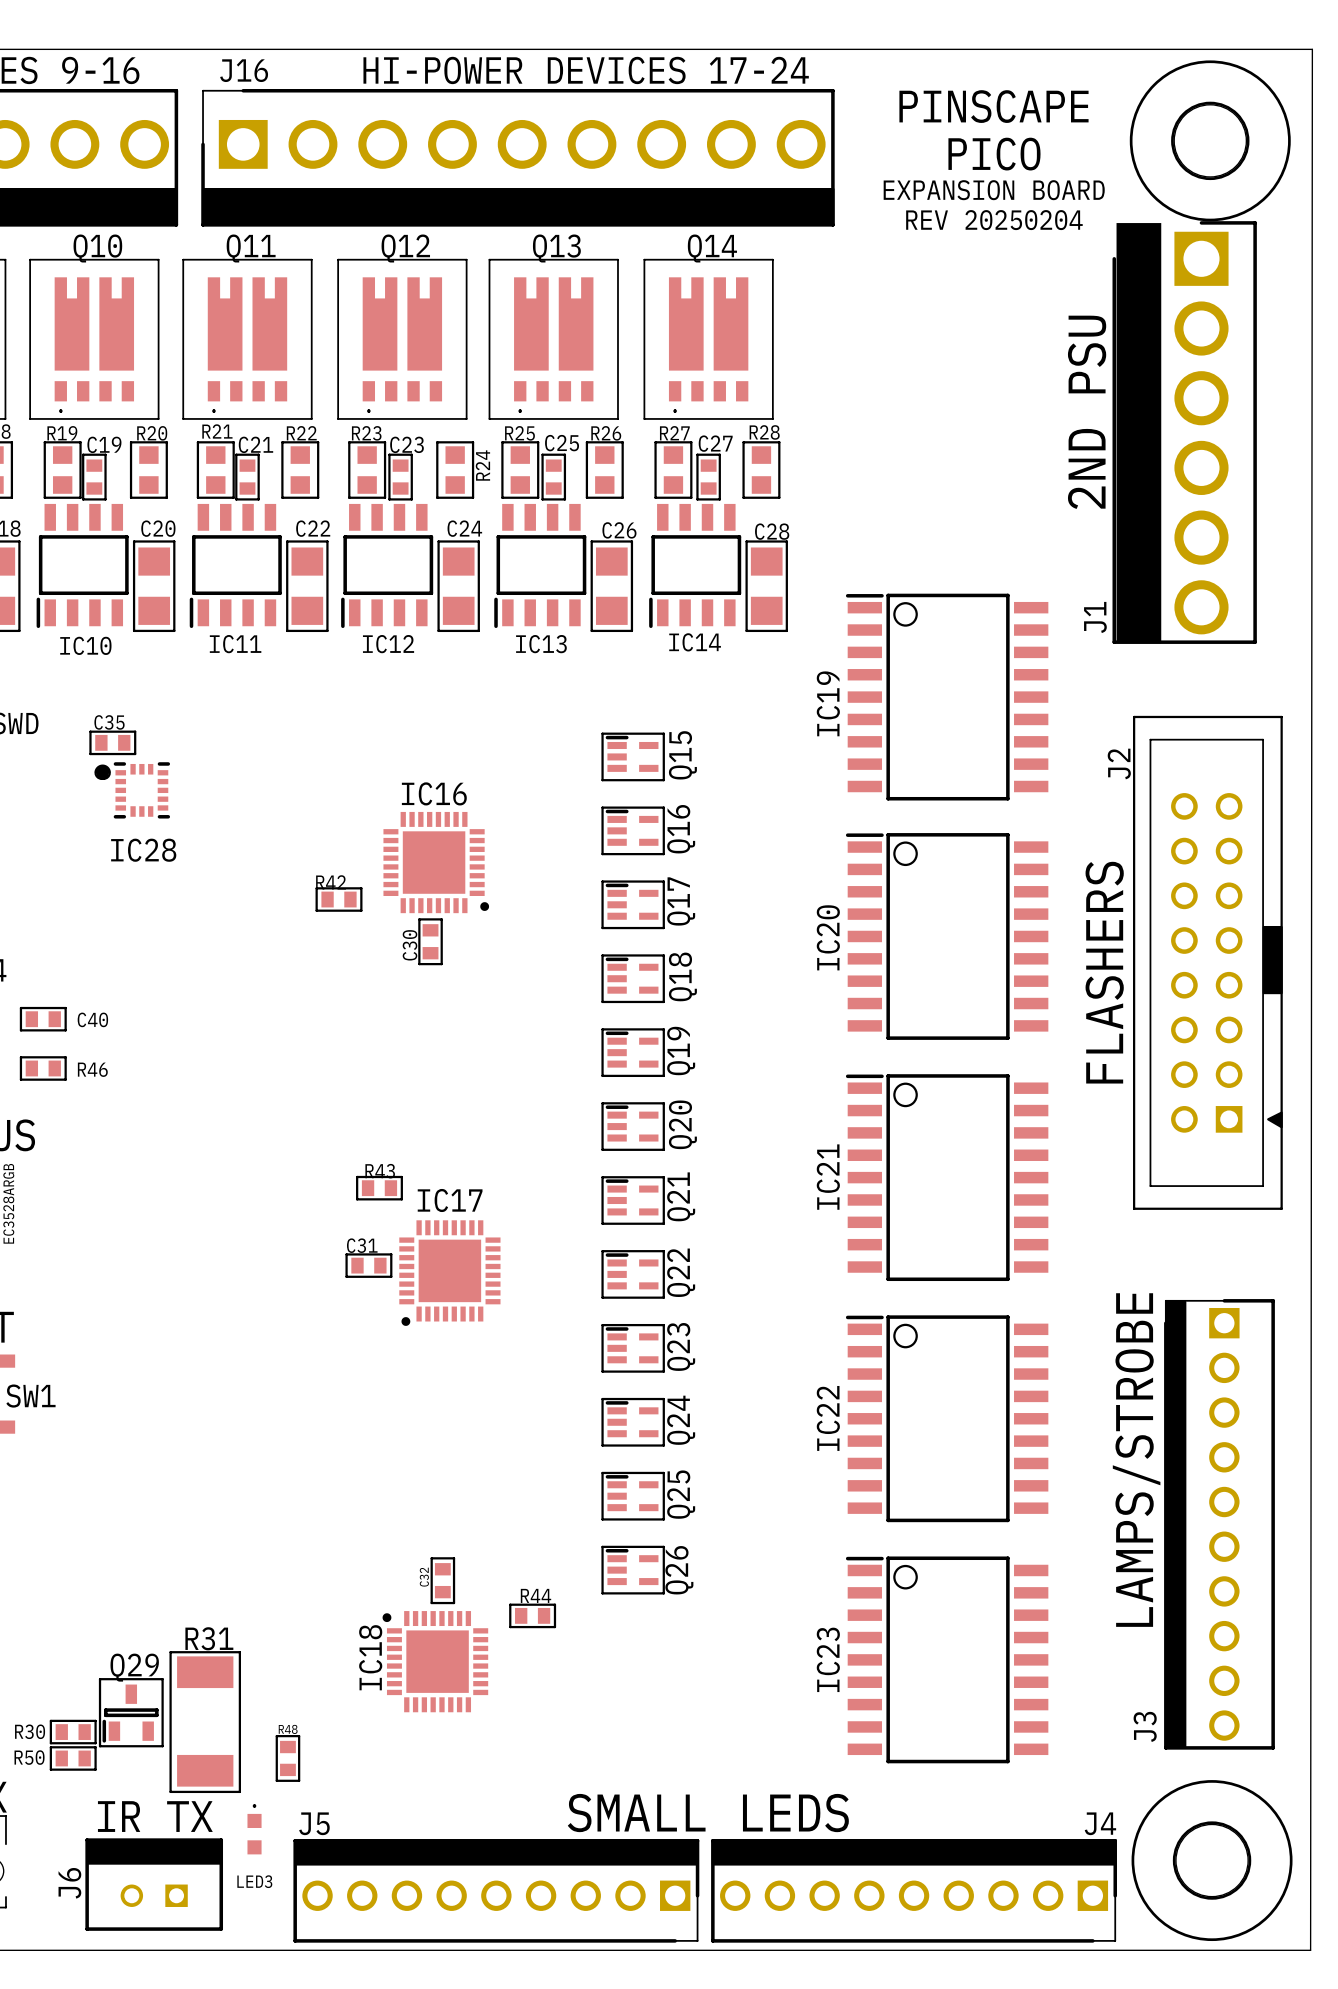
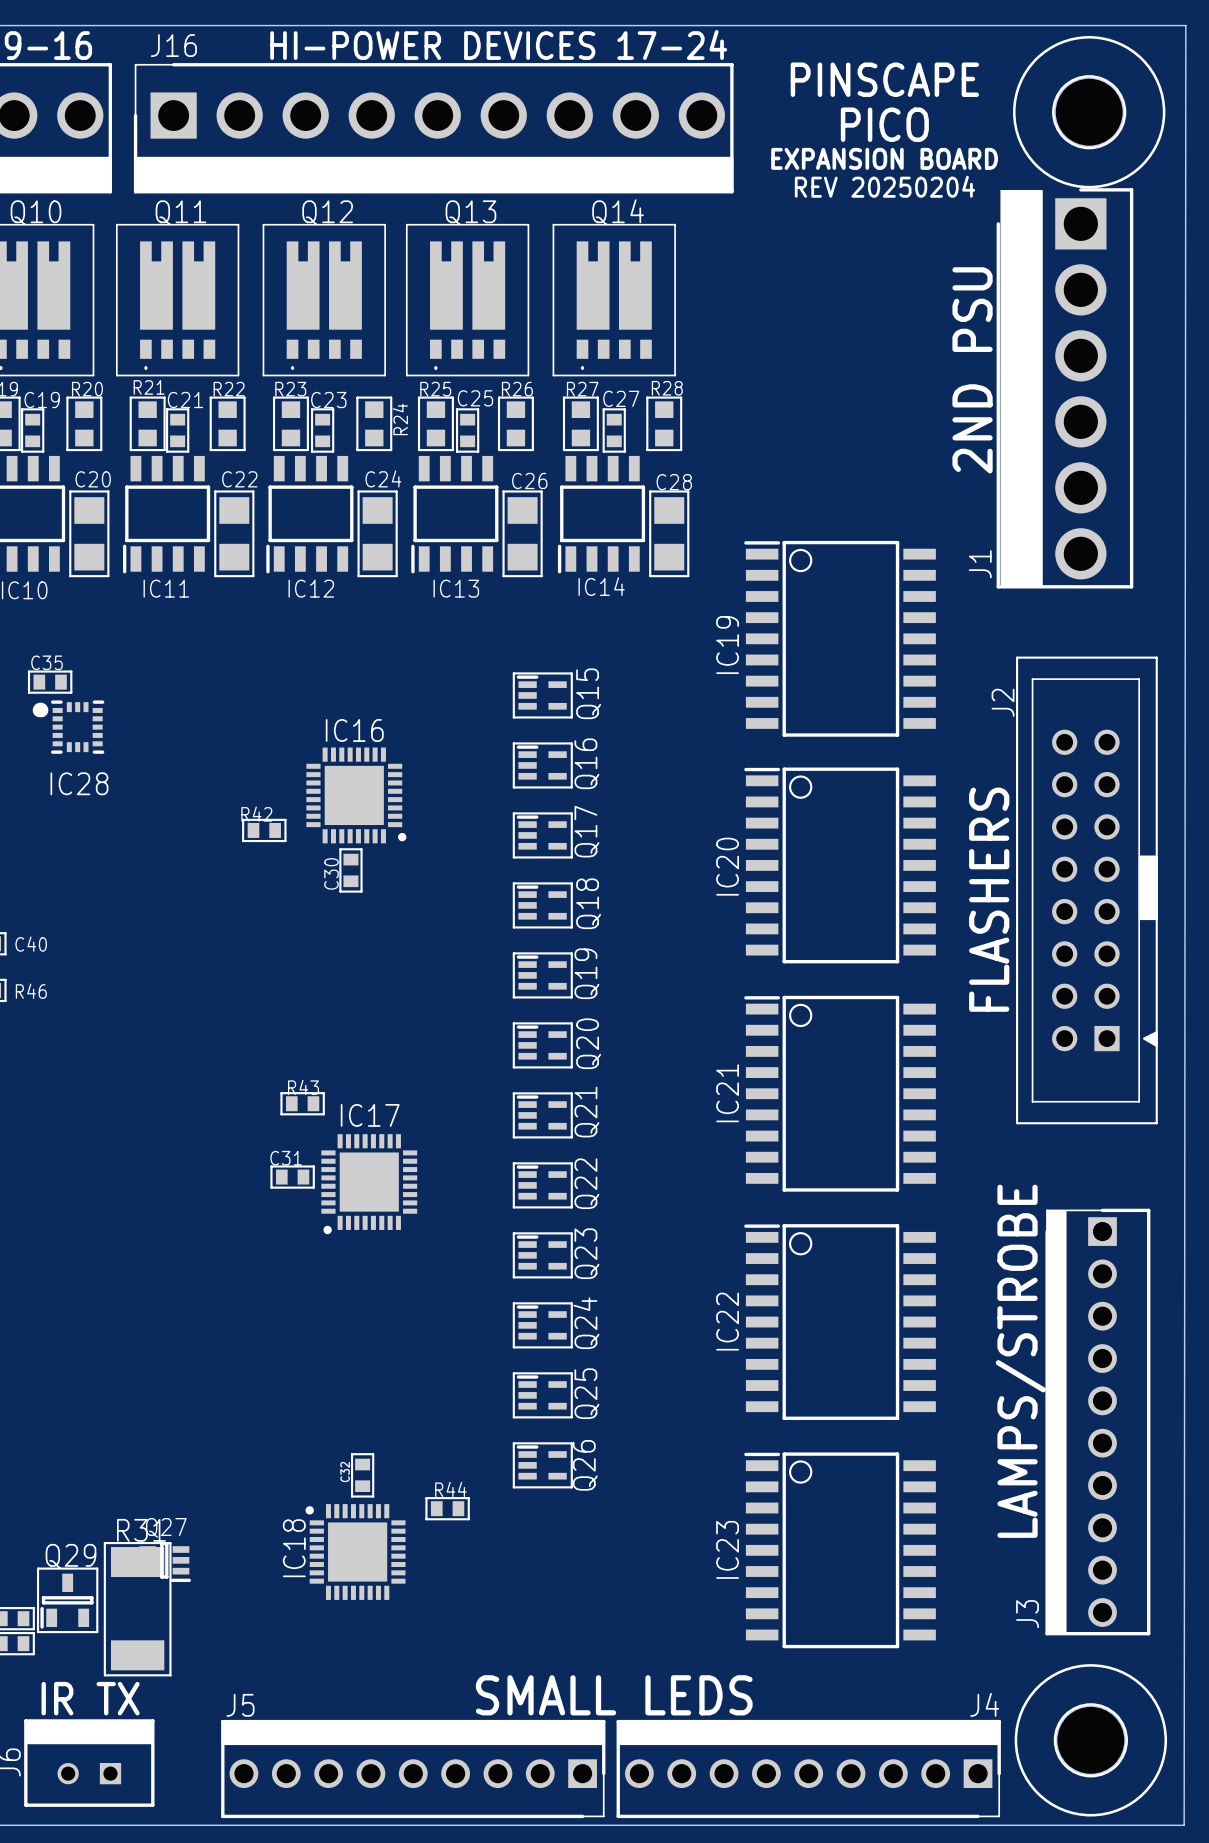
Q27: none -> (165, 1562)
R48: (287, 1758) -> none
LED3: (254, 1829) -> none

